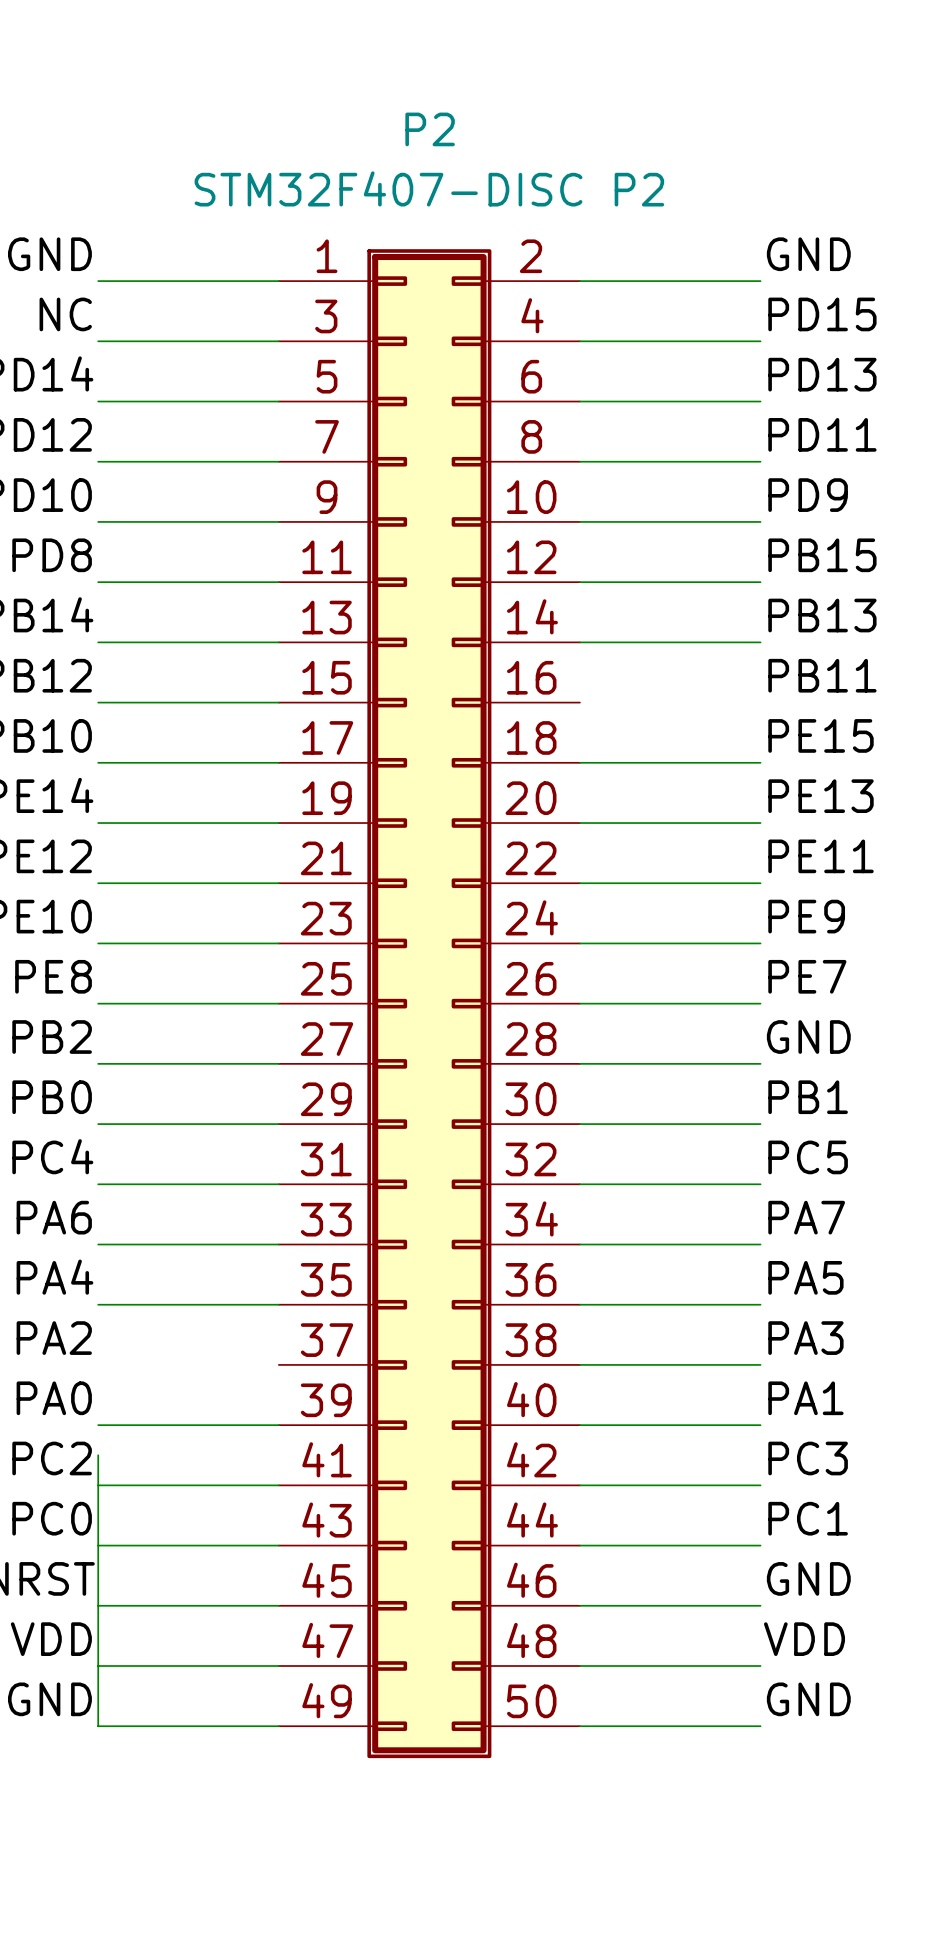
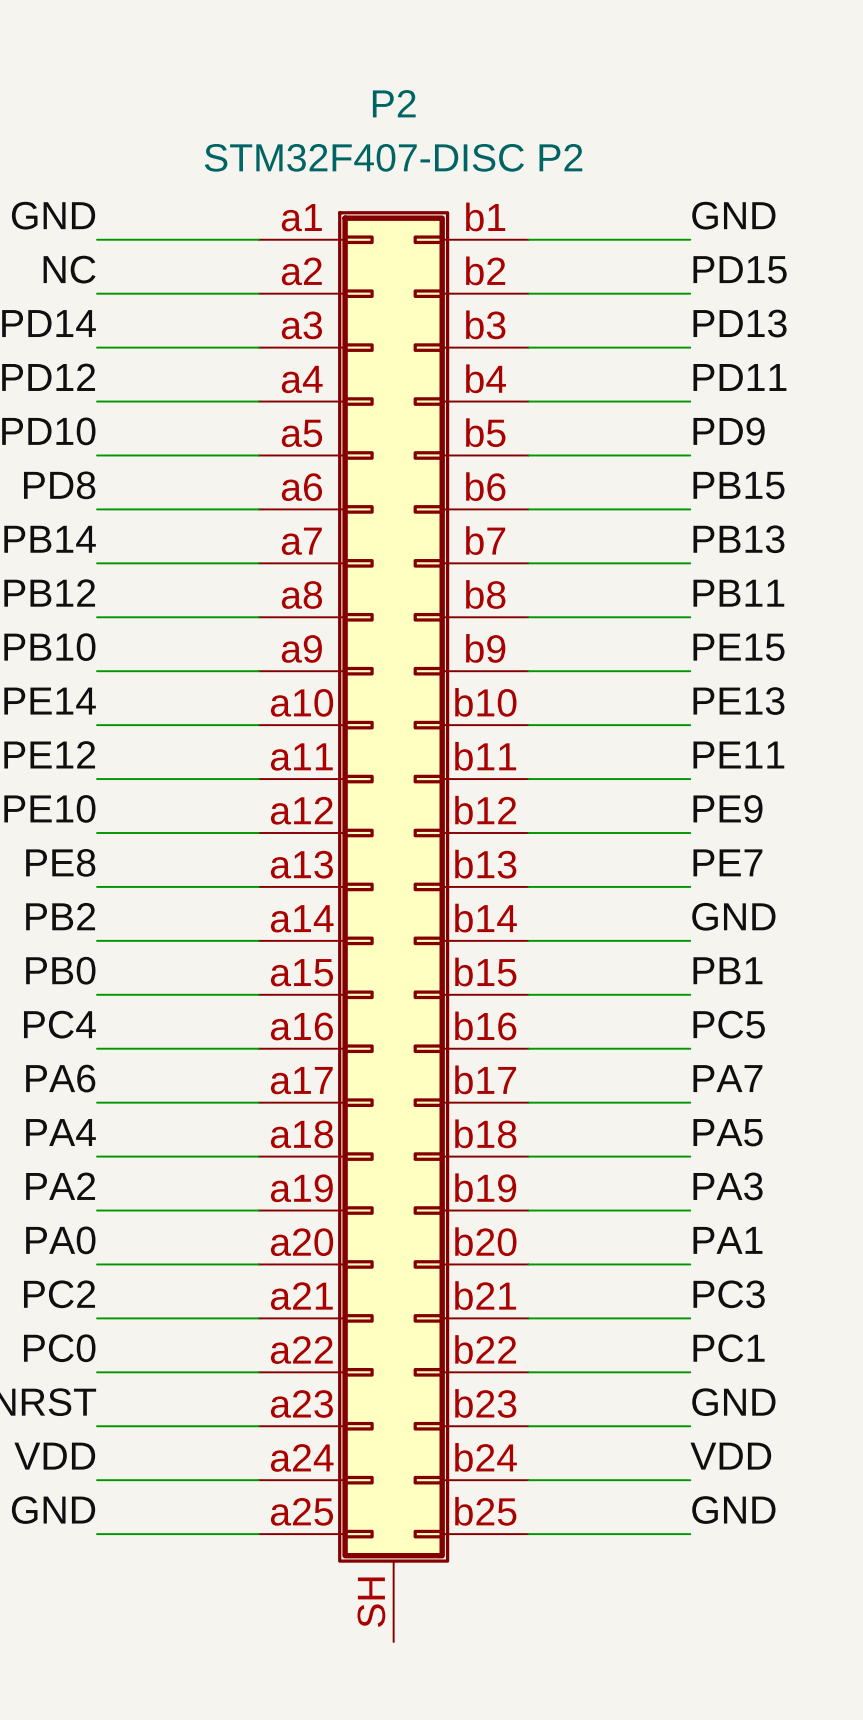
P2 symbol: [278, 249, 580, 1759] -> [258, 211, 529, 1642]
wire: none -> (528, 617) (690, 617)
wire: none -> (97, 1210) (258, 1210)
wire: (98, 1455) (98, 1726) -> none

